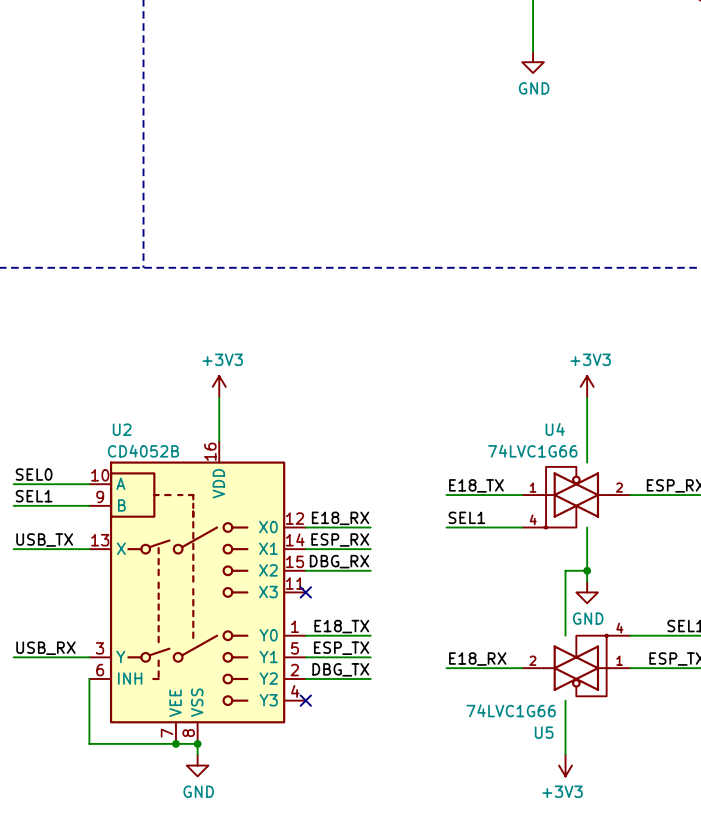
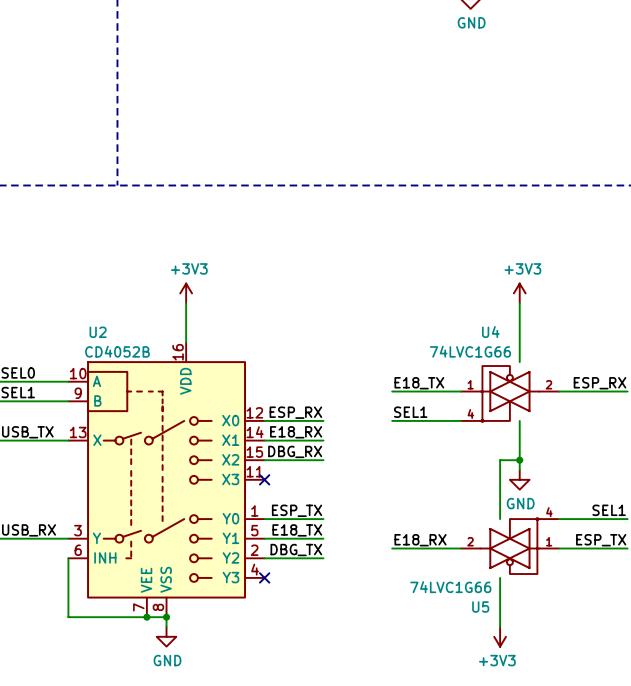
label: E18_RX (340, 518) -> ESP_RX (295, 412)
label: ESP_RX (340, 540) -> E18_RX (296, 432)
label: E18_TX (341, 626) -> ESP_TX (297, 510)
label: ESP_TX (341, 648) -> E18_TX (297, 530)

